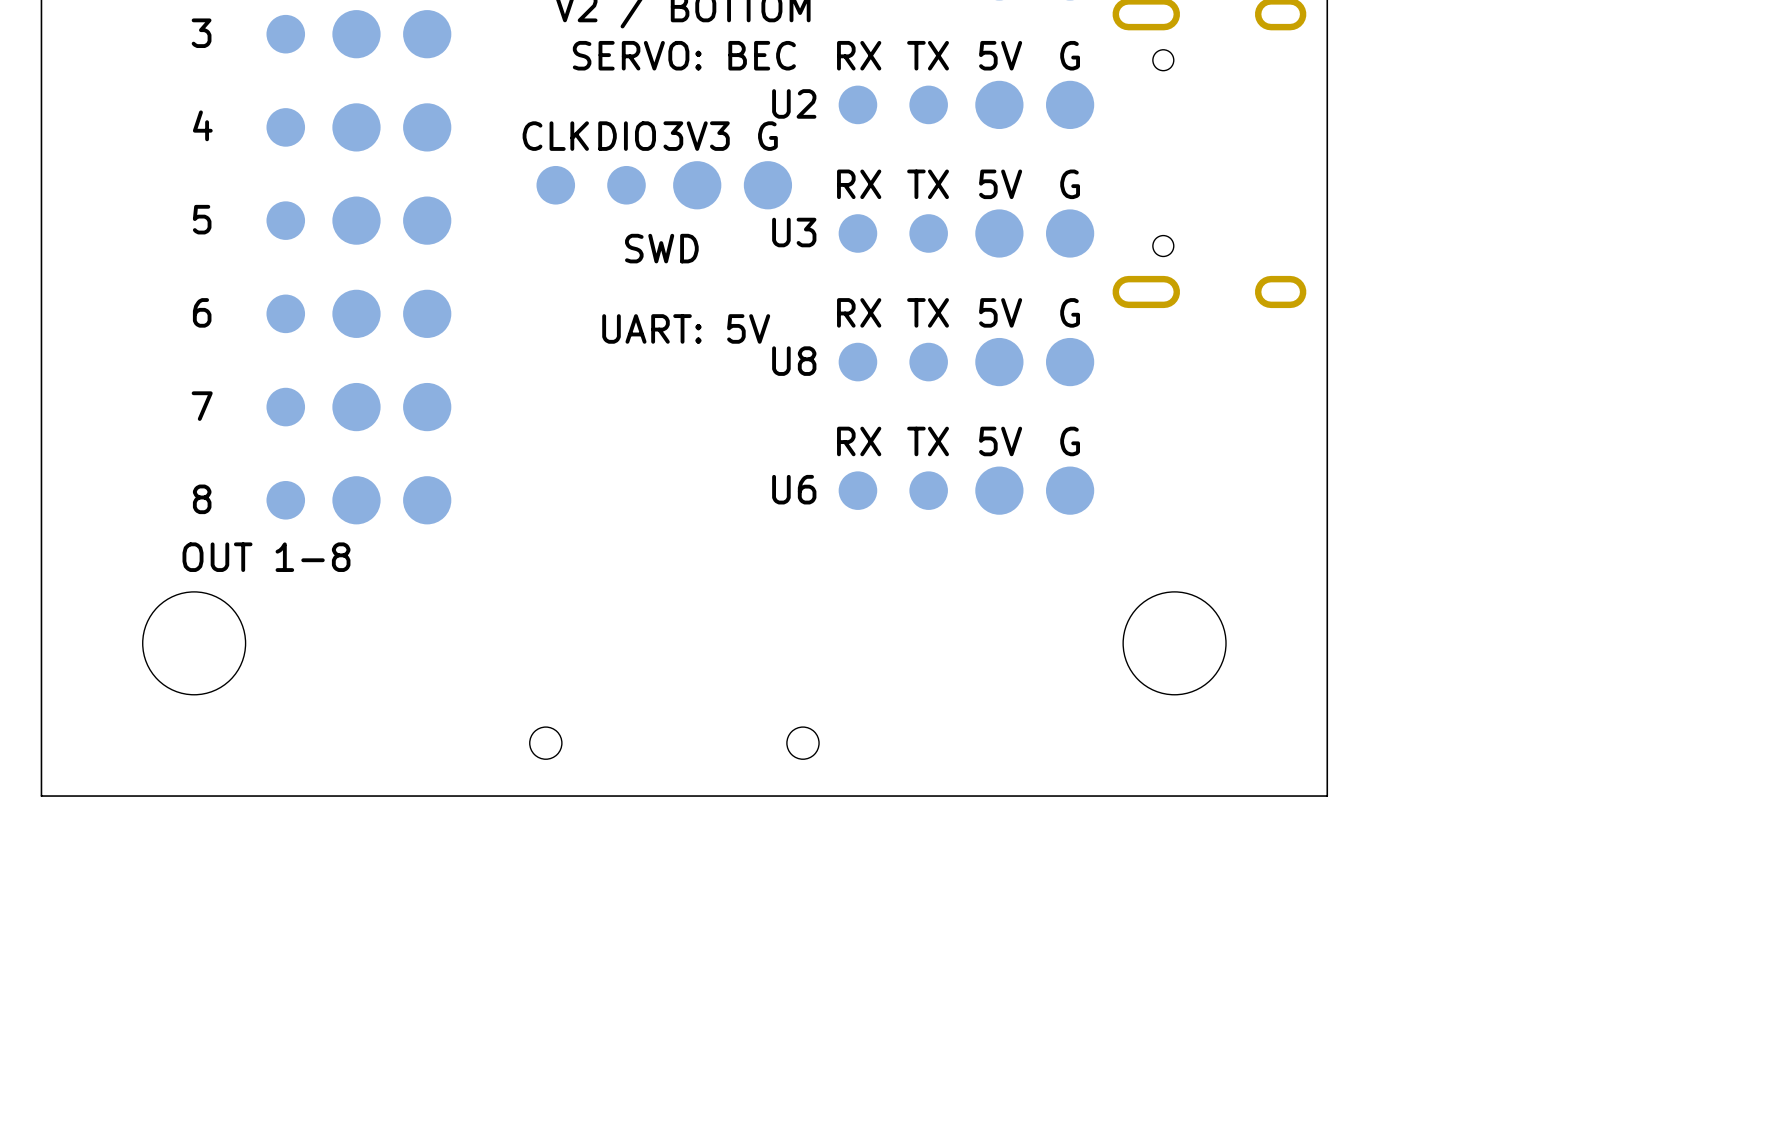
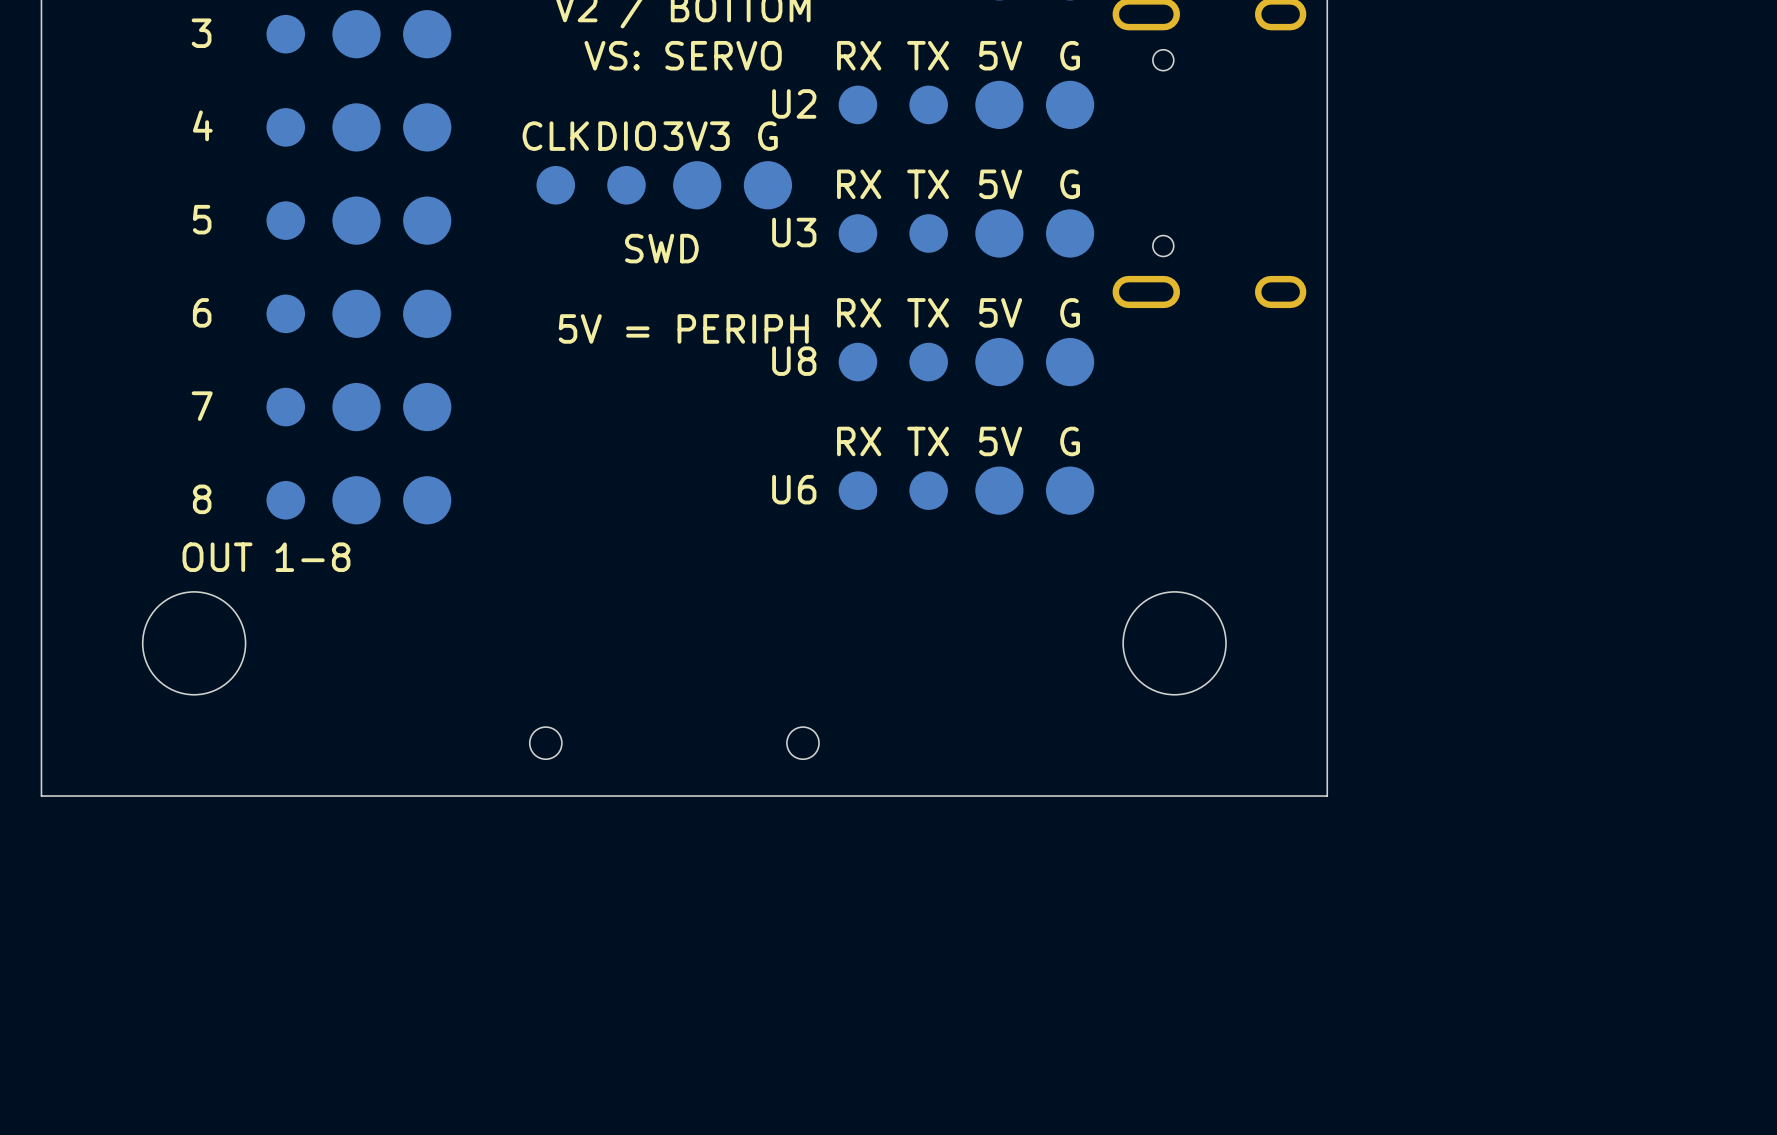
text: SERVO: BEC (684, 55) -> VS: SERVO (683, 55)
text: UART: 5V (686, 328) -> 5V = PERIPH (683, 328)

